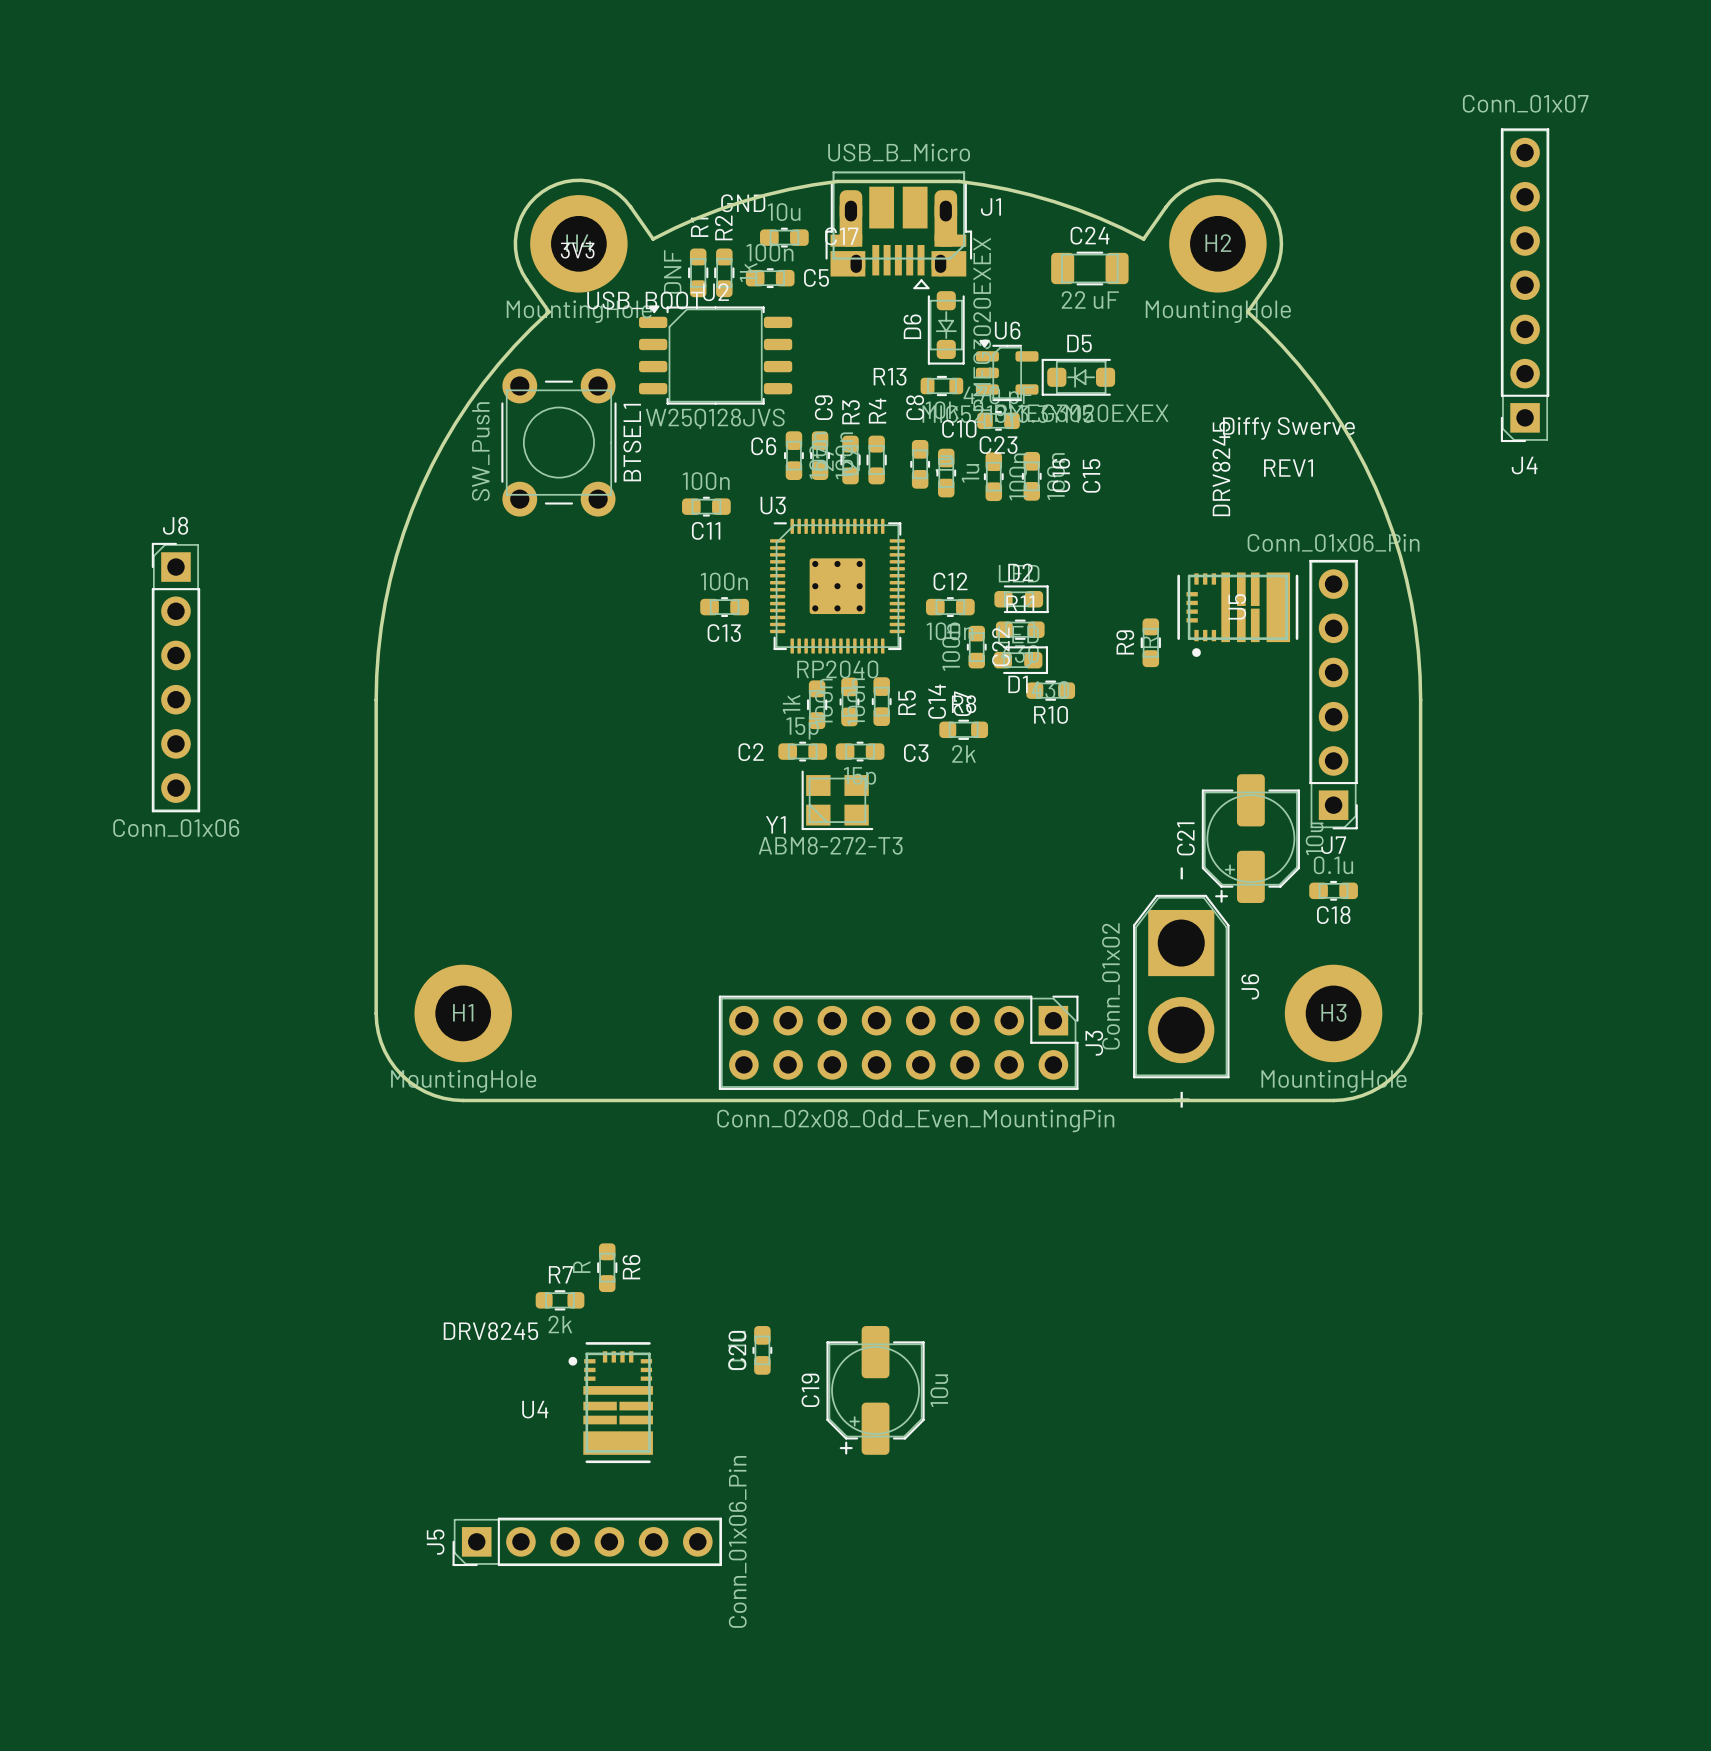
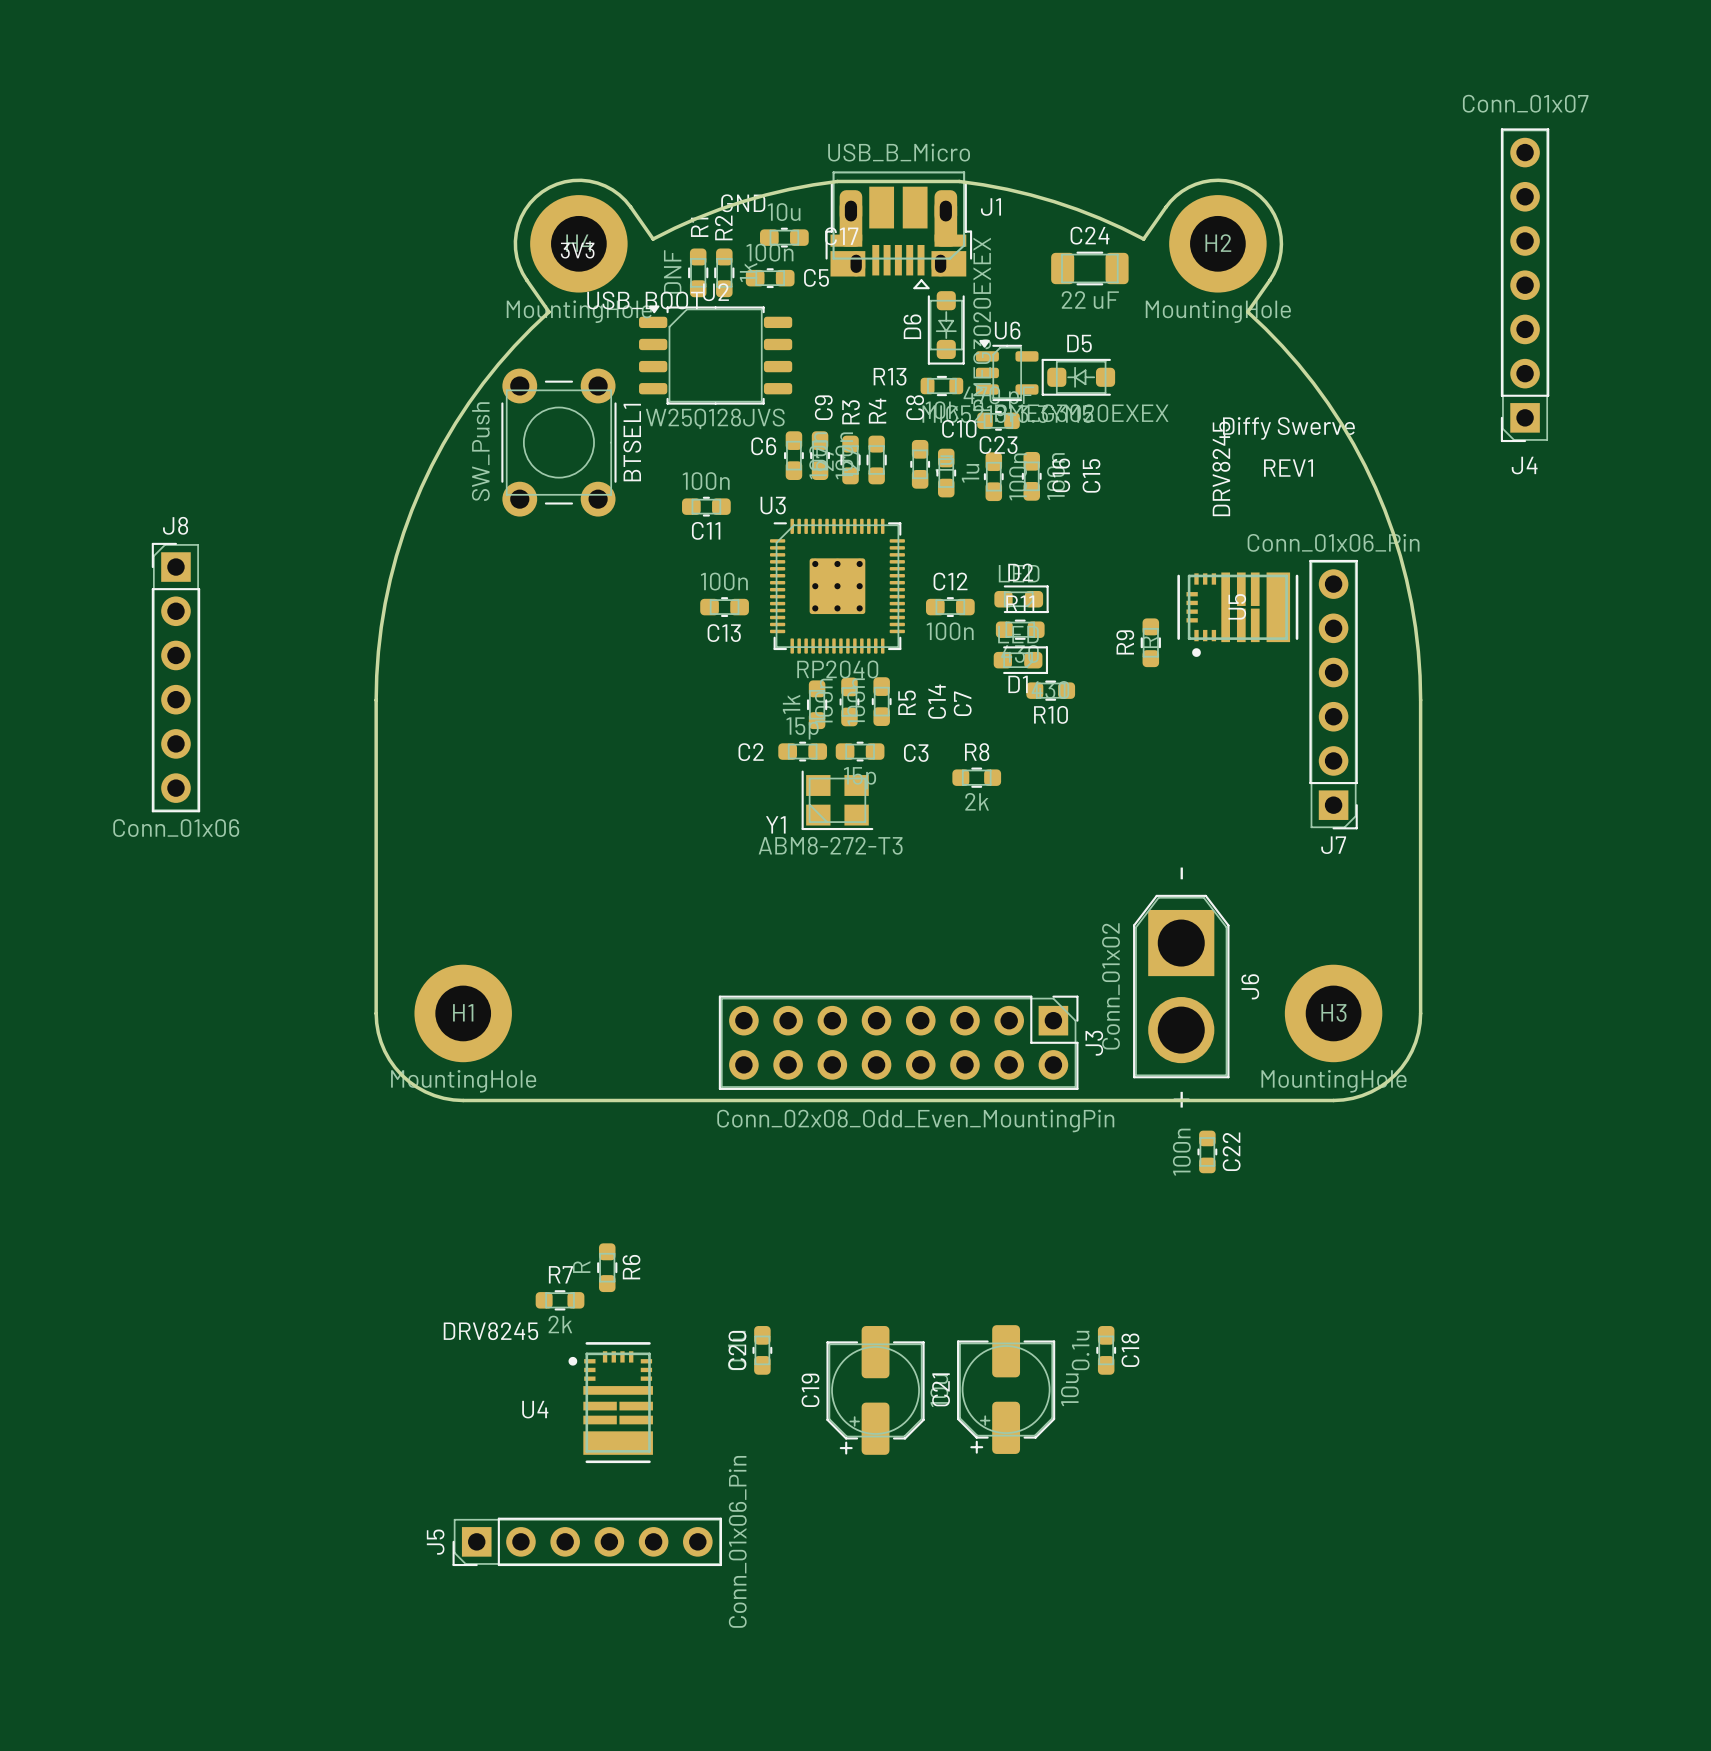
C22 position: (976, 647) -> (1207, 1151)
R8 position: (963, 729) -> (976, 777)
C21 position: (1250, 838) -> (1006, 1389)
C18 value position: 0.1u (1333, 865) -> 0.1u (1080, 1350)
C18 rotation: 0° (1333, 890) -> 90° clockwise (1106, 1350)
C18 position: (1333, 890) -> (1106, 1350)
C18 name position: C18 (1333, 915) -> C18 (1130, 1350)

